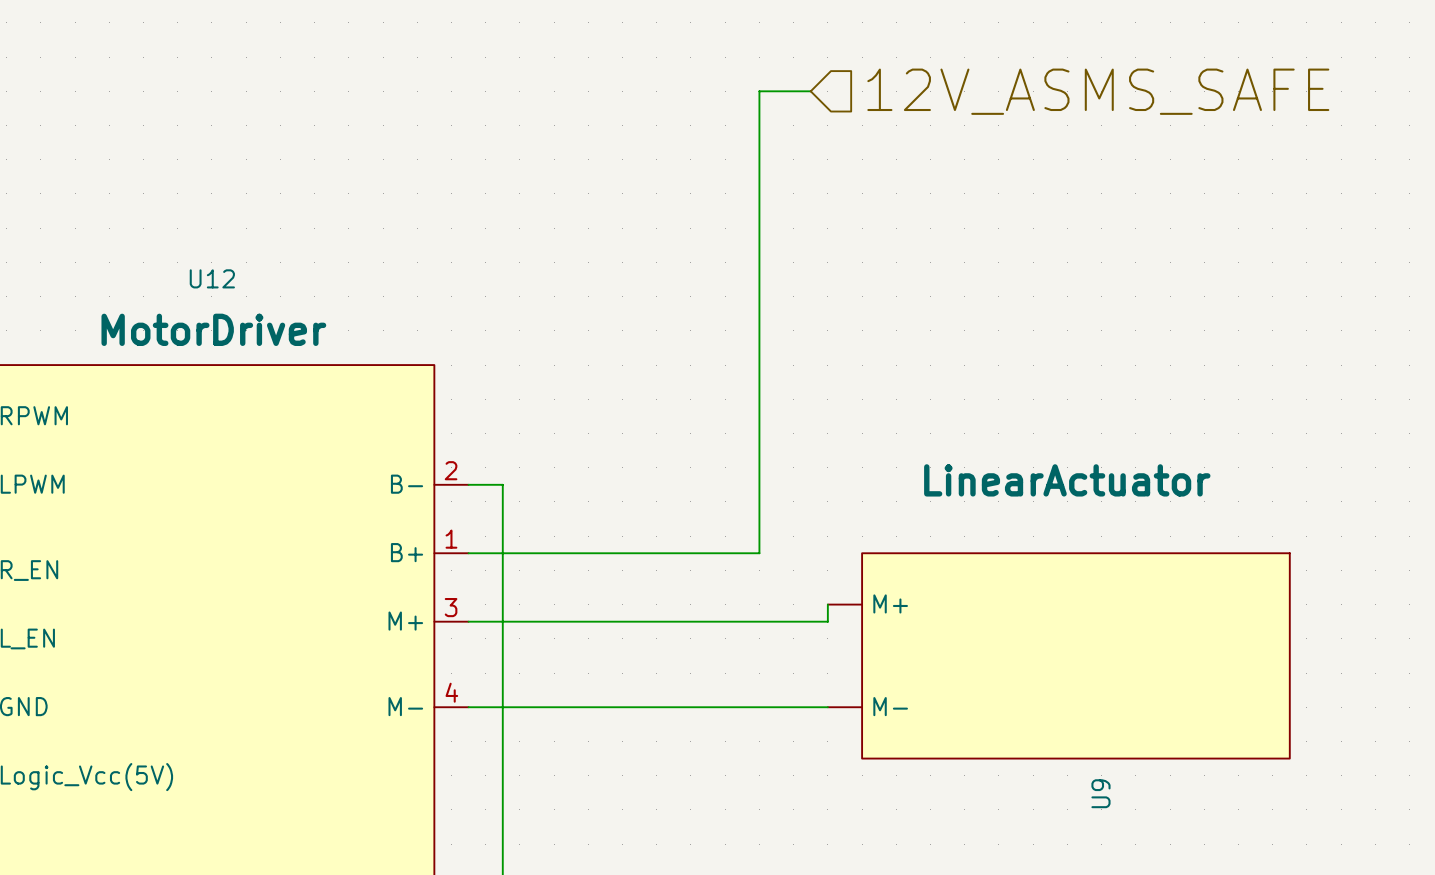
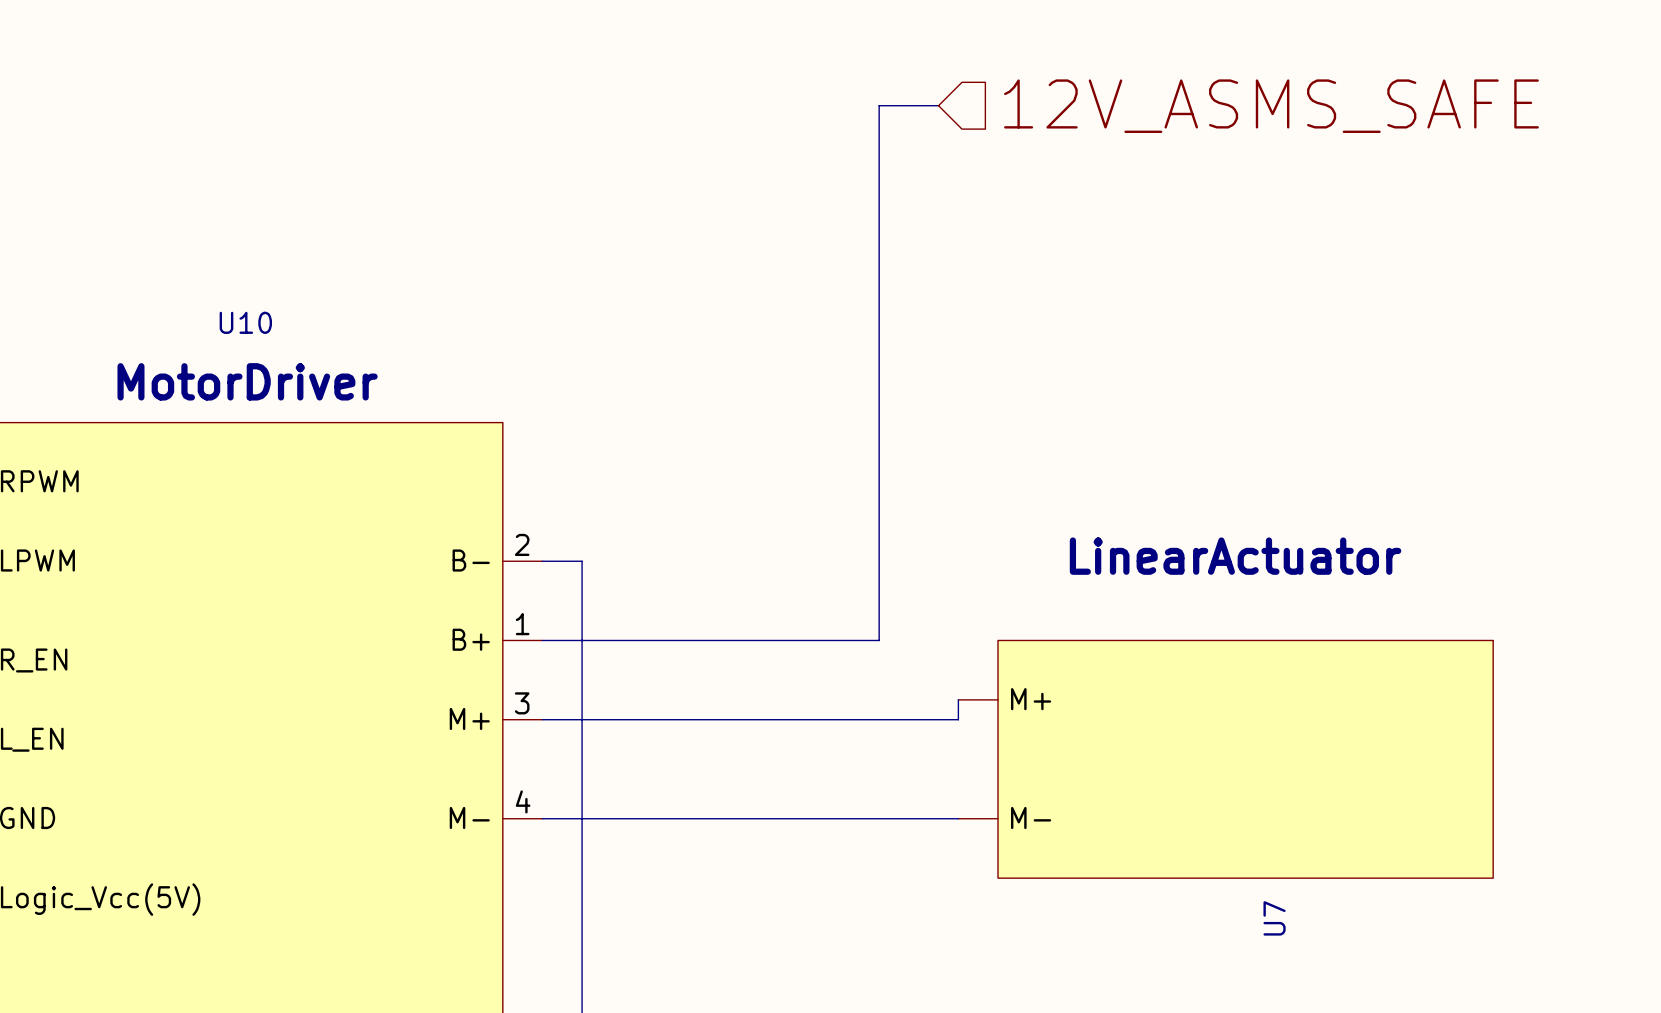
U12 name: U12 (212, 278) -> U10 (245, 322)
U9 name: U9 (1100, 793) -> U7 (1274, 918)

